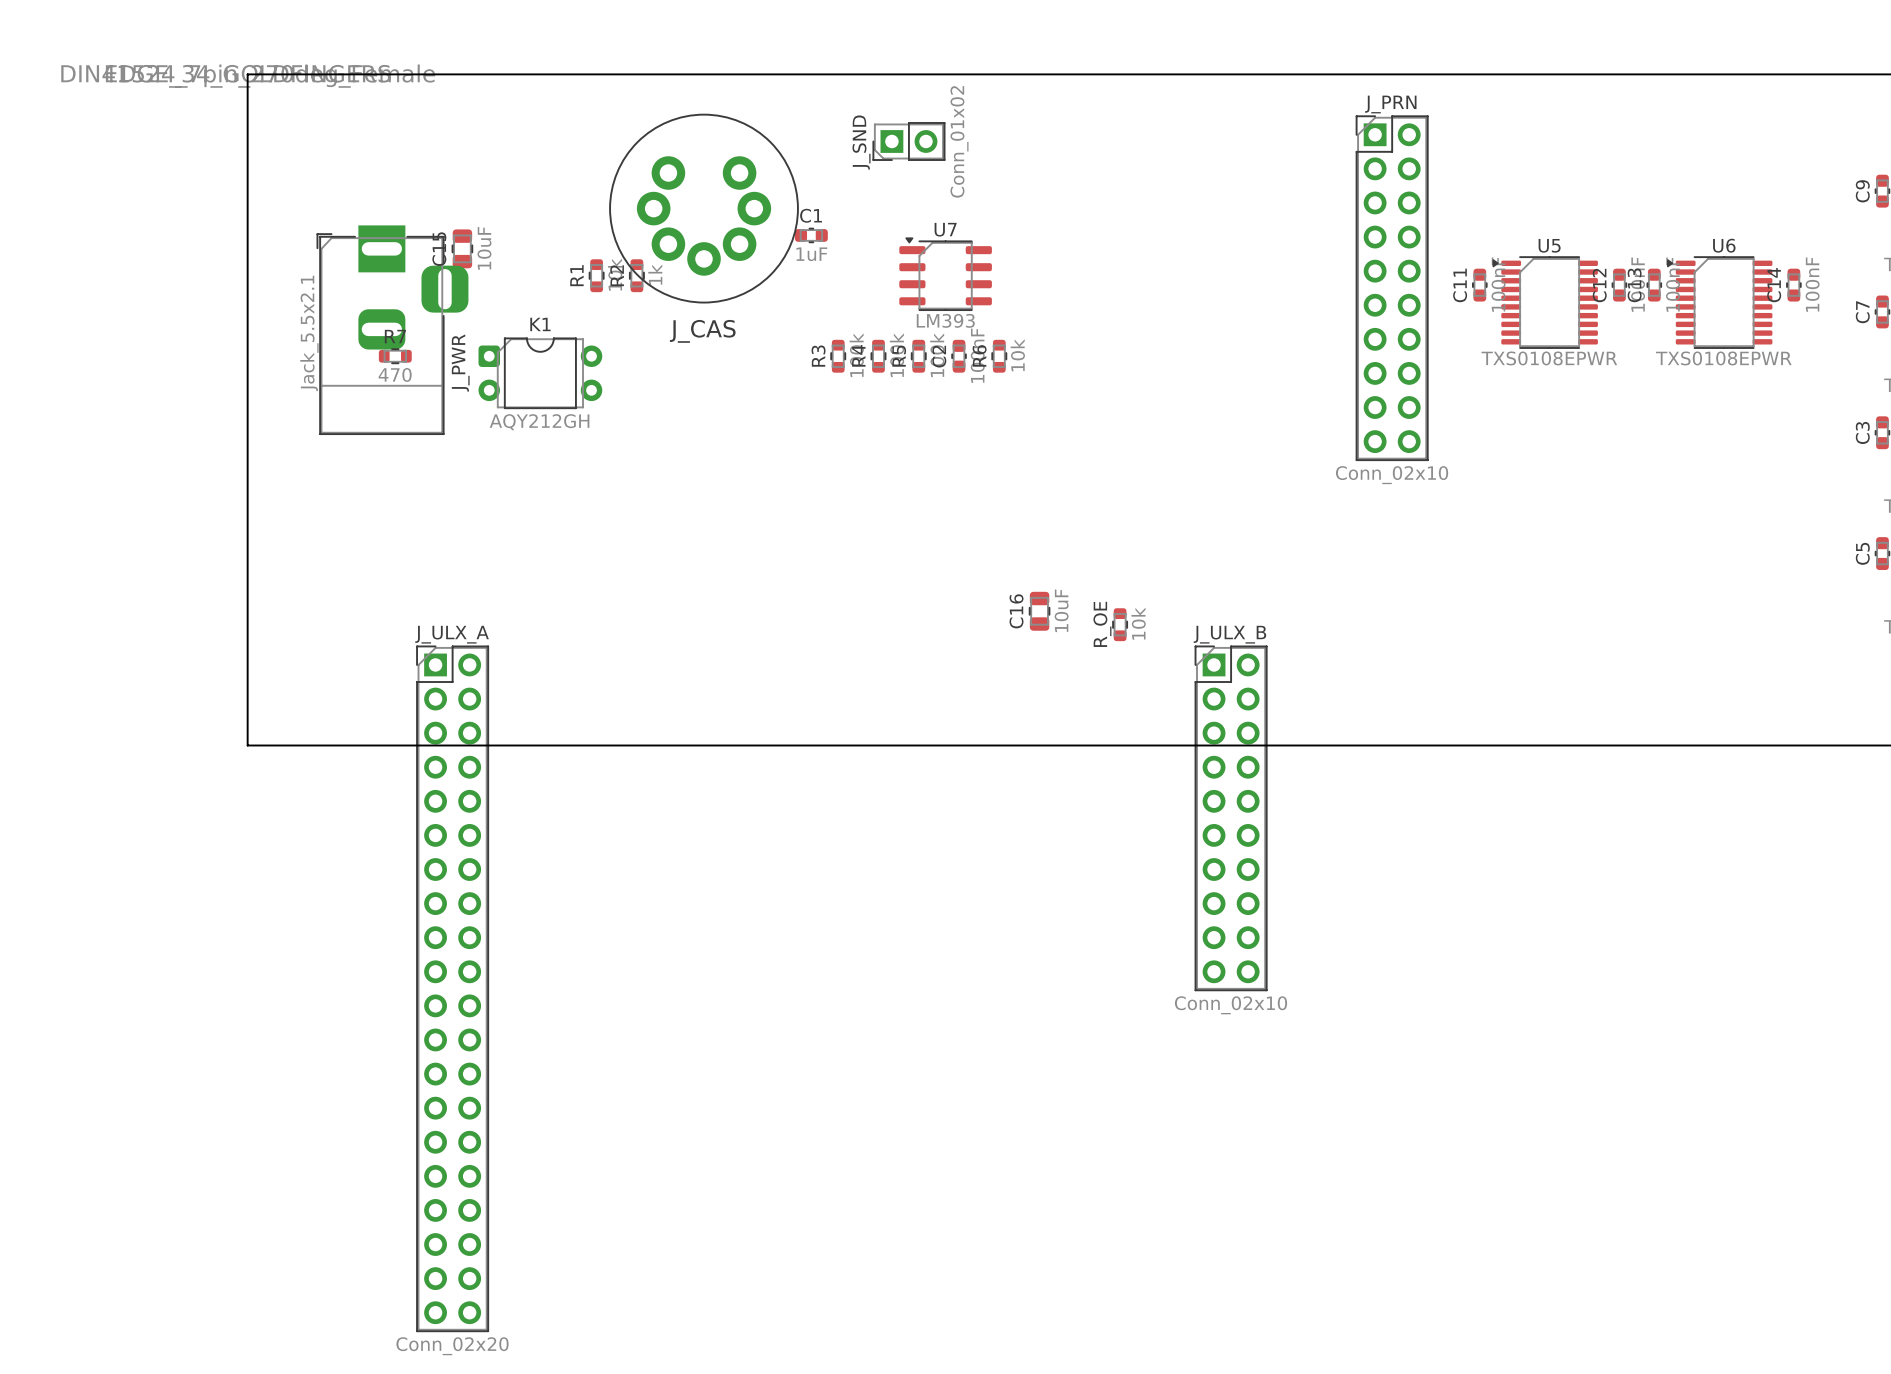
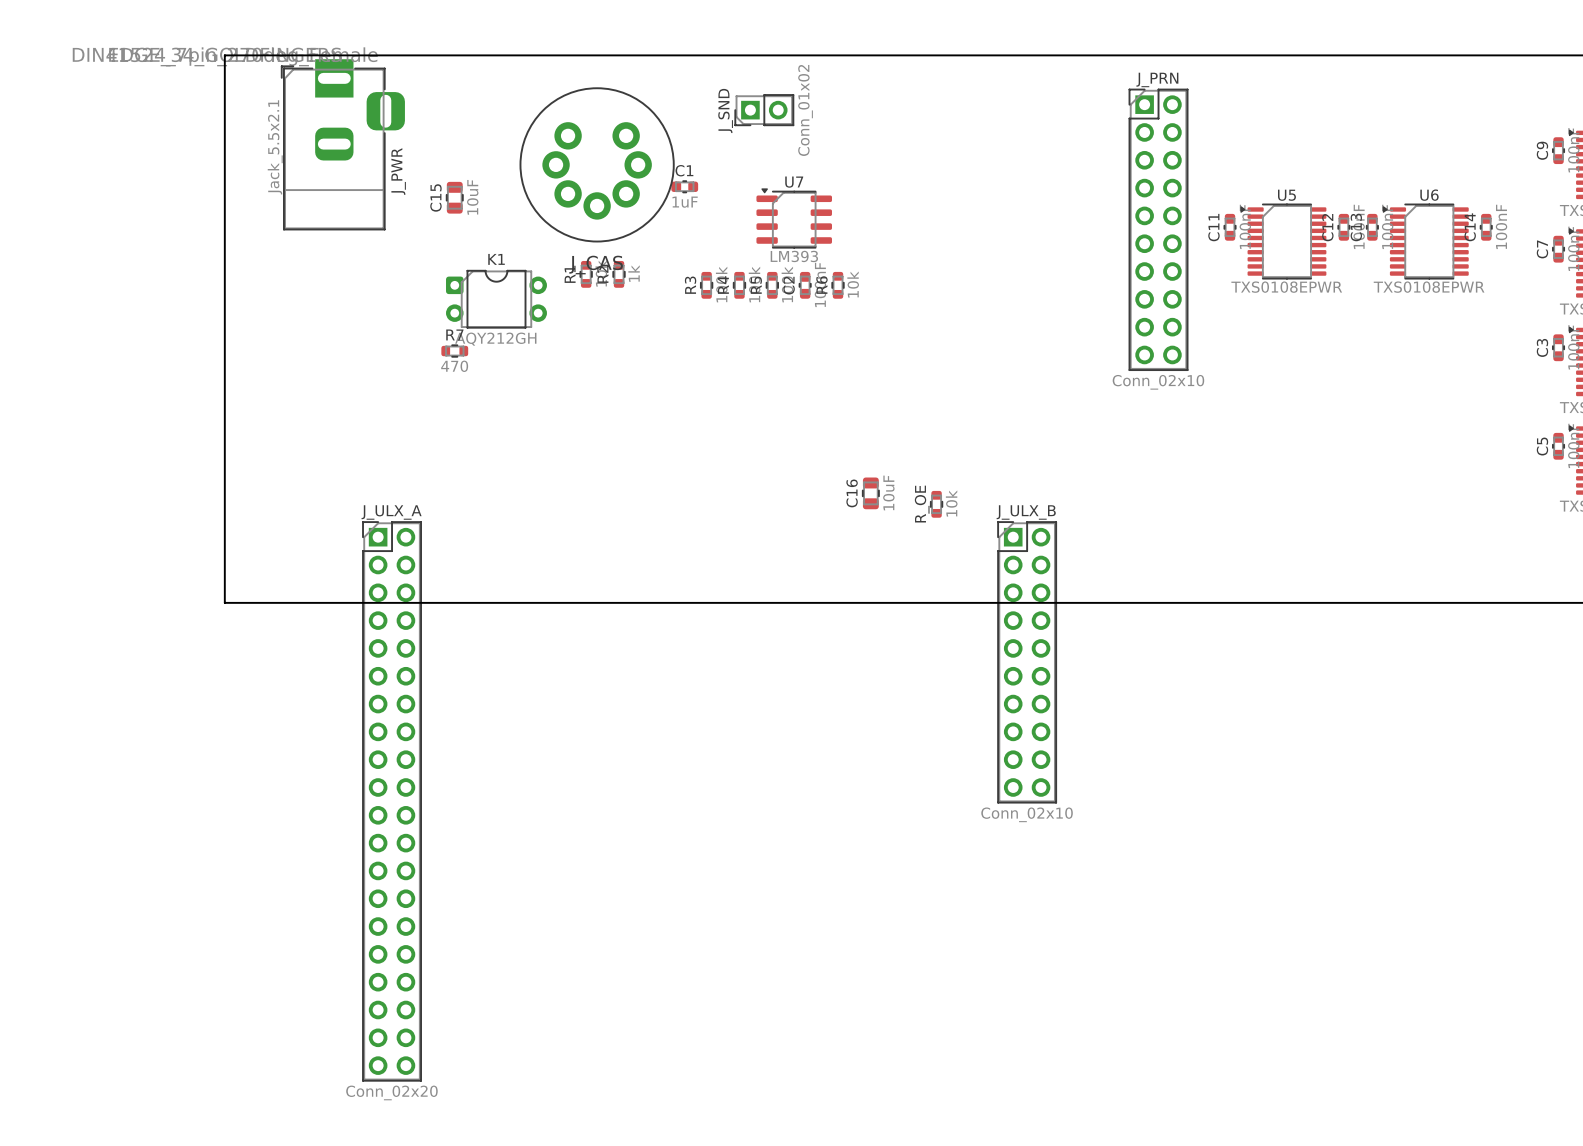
C15 position: (462, 248) -> (454, 197)
R1 position: (596, 275) -> (586, 274)
R2 position: (636, 275) -> (619, 274)
J_PWR position: (392, 330) -> (343, 144)
R7 position: (395, 356) -> (454, 351)
K1 position: (540, 373) -> (496, 299)

